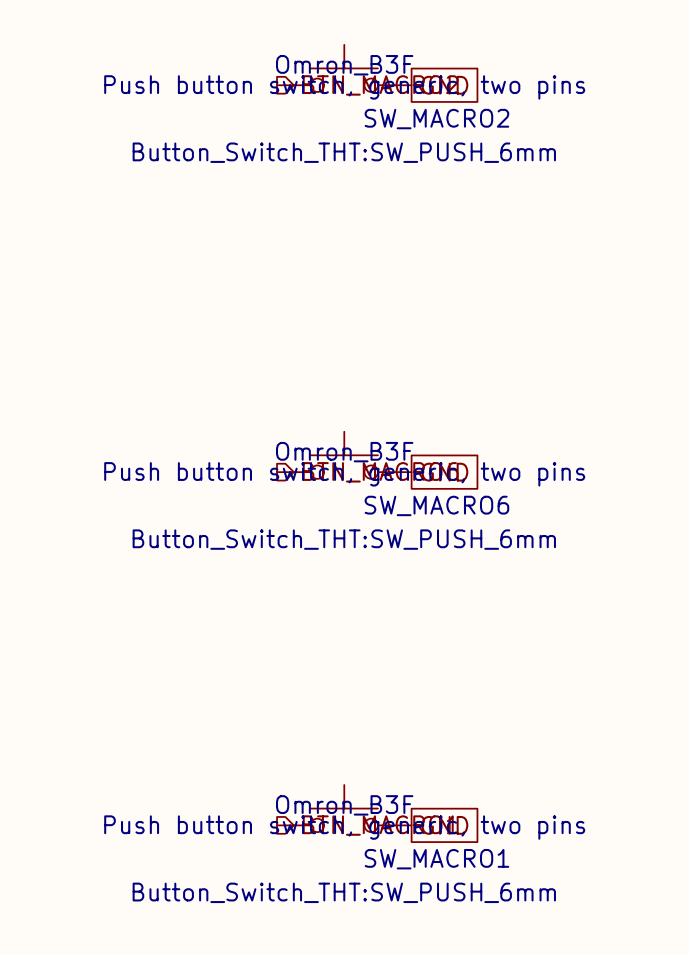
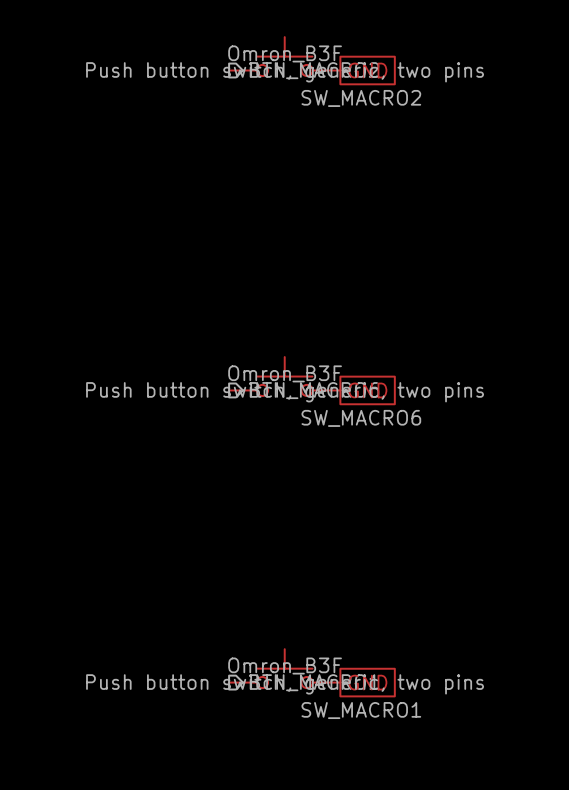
SW_MACRO2 text: Button_Switch_THT:SW_PUSH_6mm (344, 152) -> none
SW_MACRO6 text: Button_Switch_THT:SW_PUSH_6mm (344, 539) -> none
SW_MACRO1 text: Button_Switch_THT:SW_PUSH_6mm (344, 892) -> none

